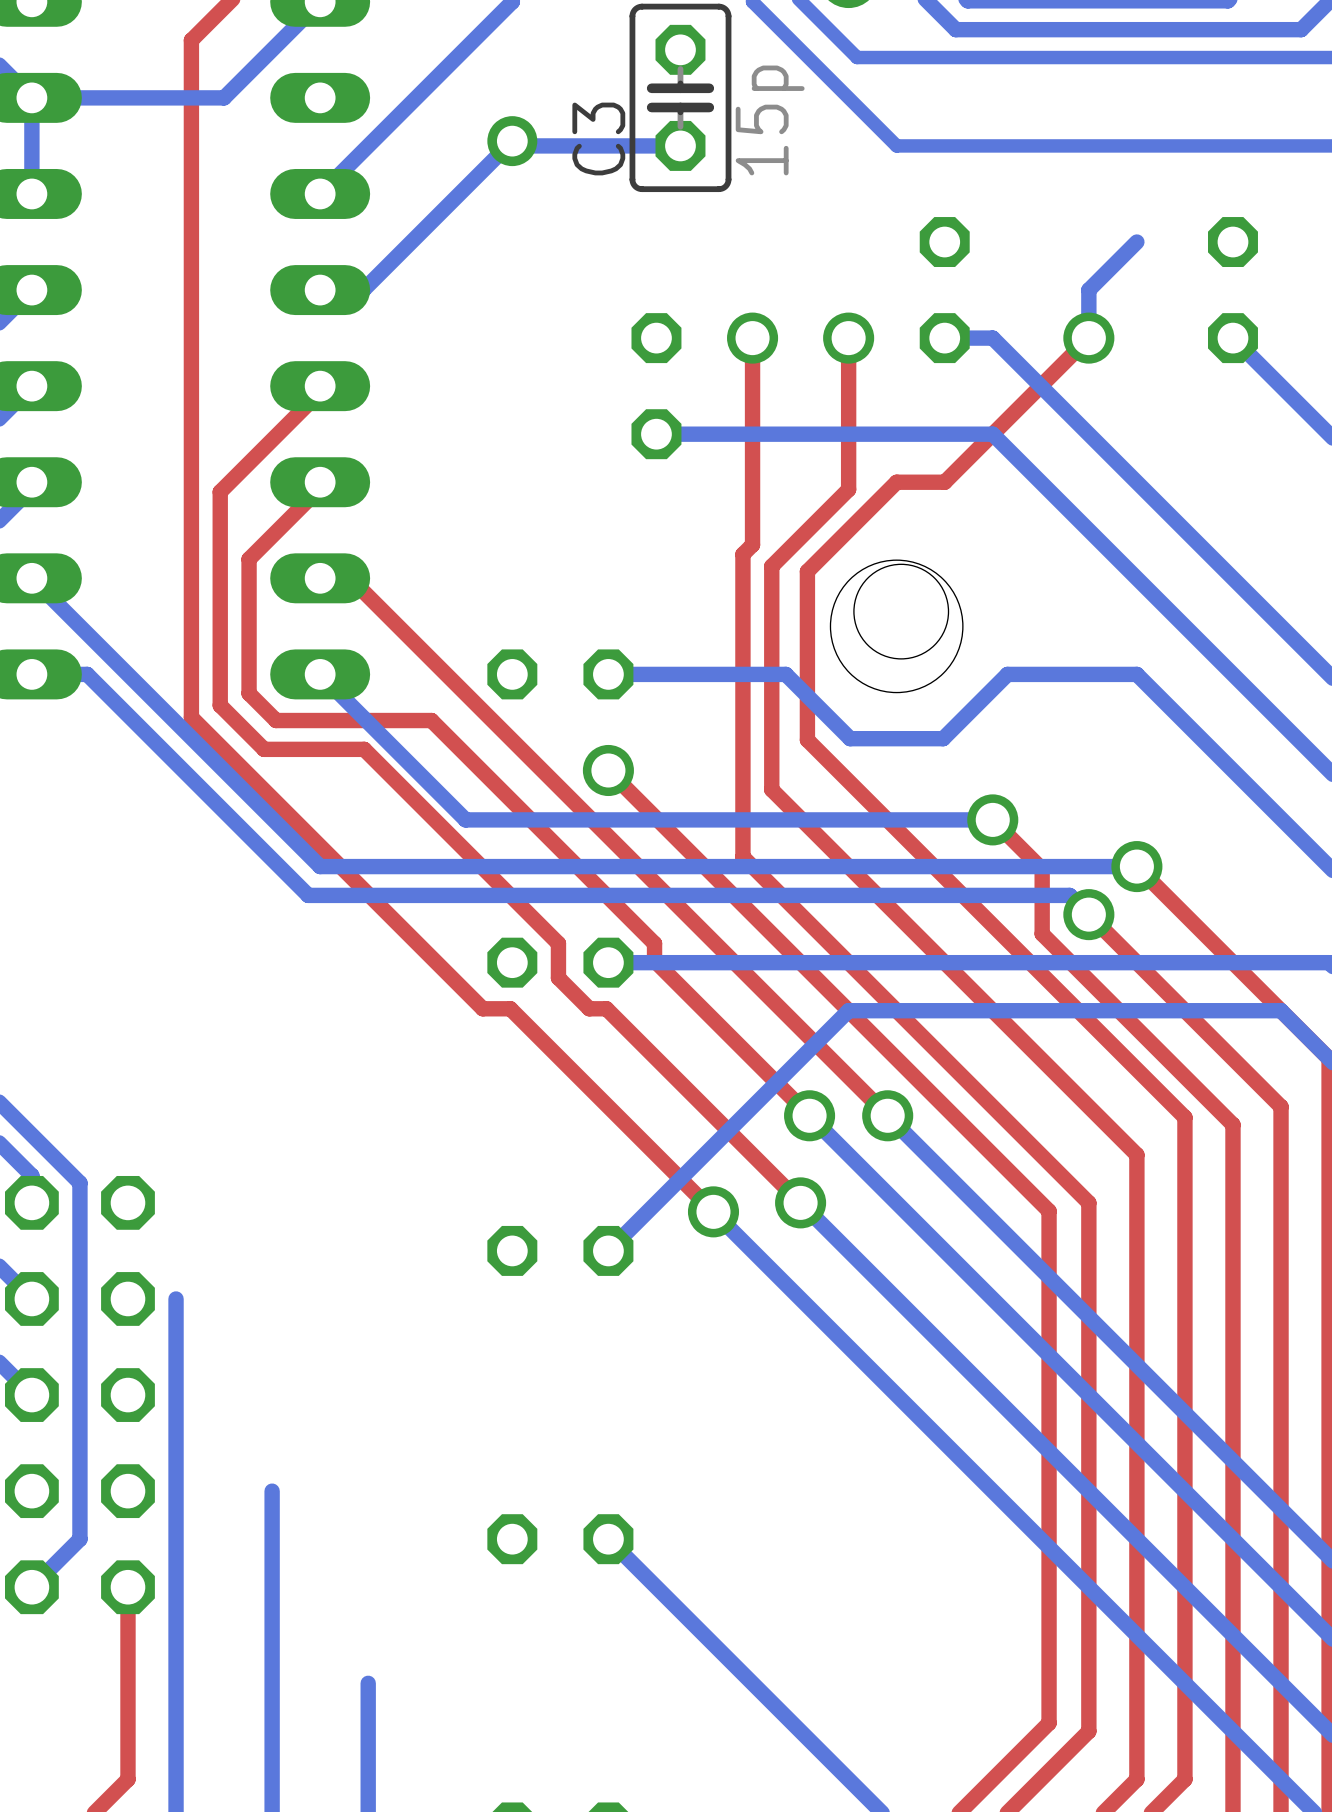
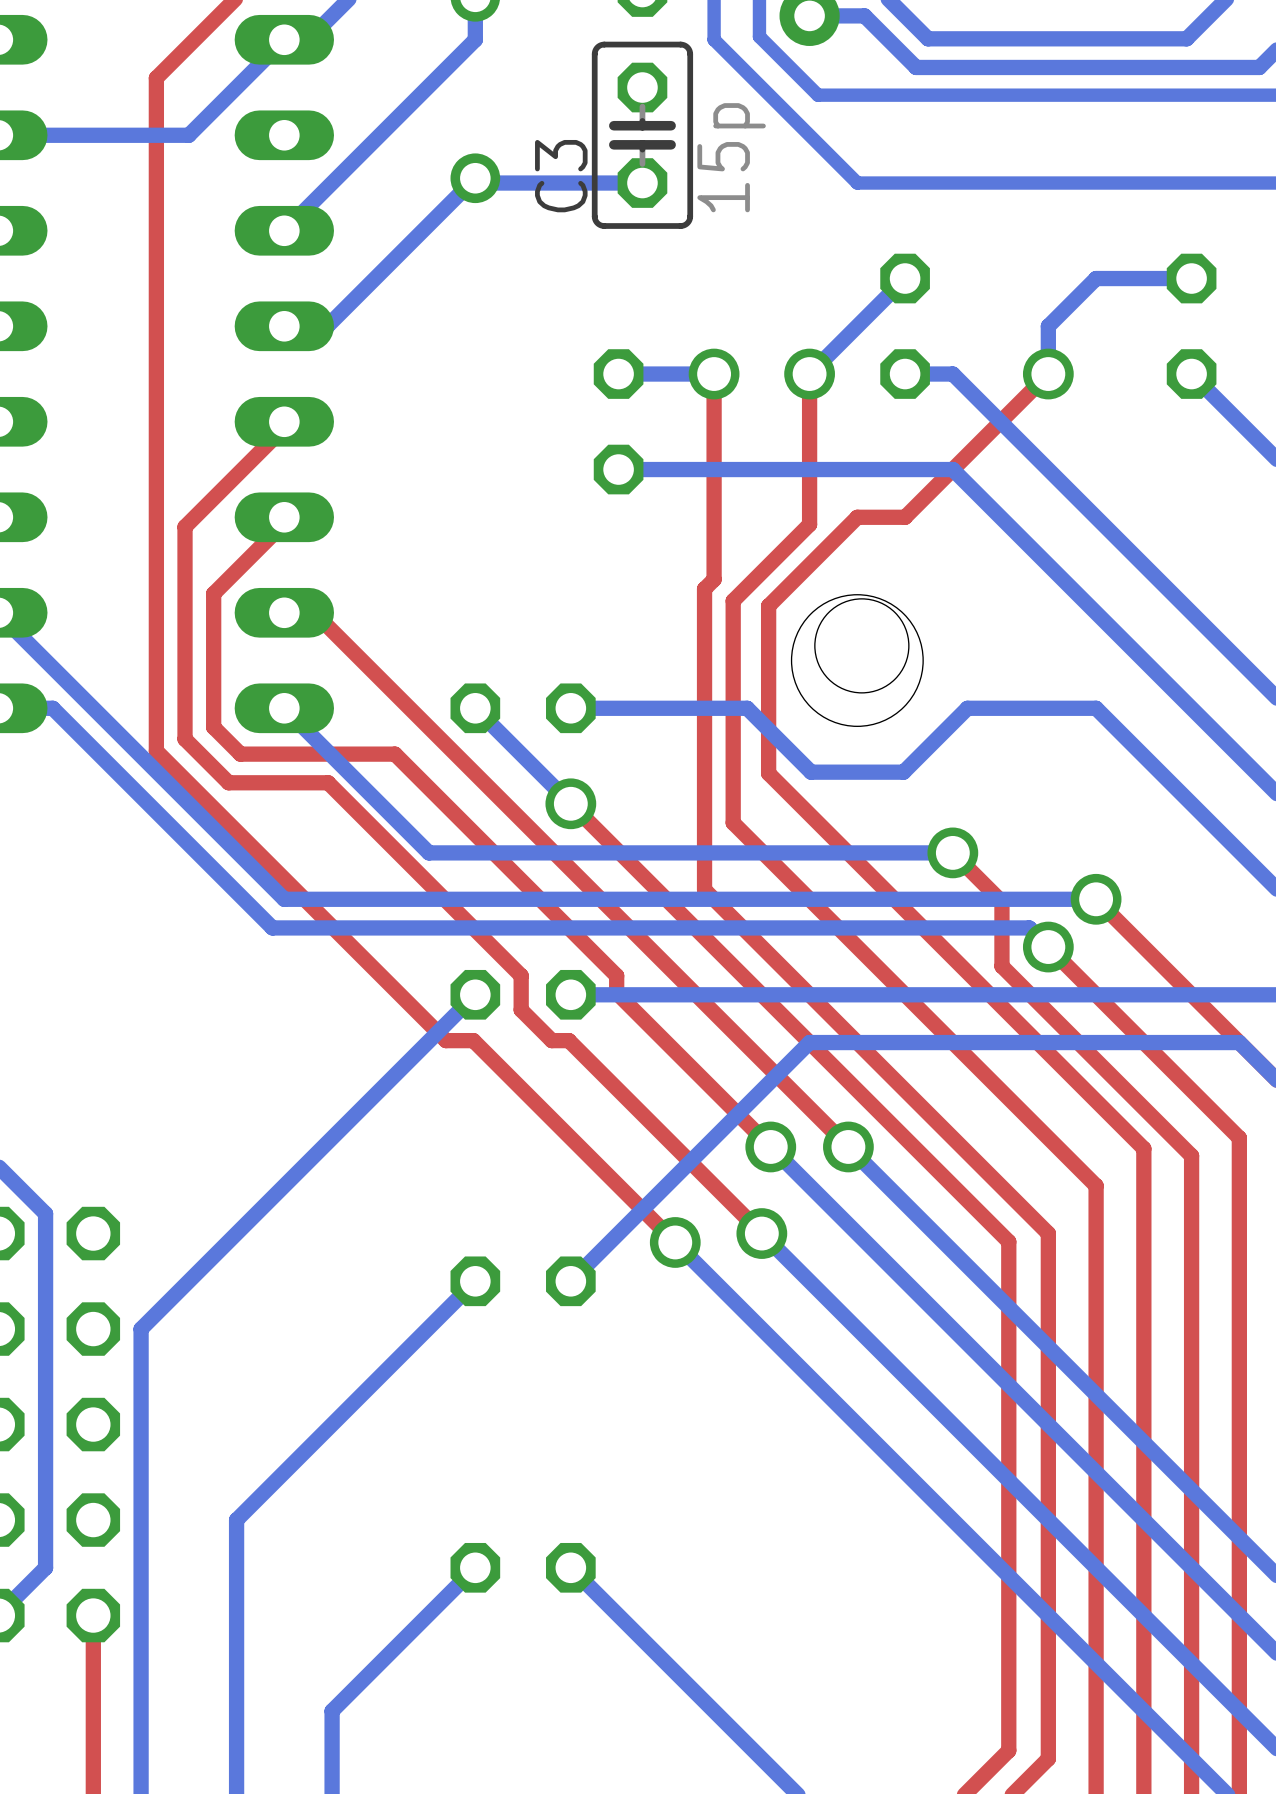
bottom track: none -> (905, 278) (809, 374)
bottom track: none -> (1191, 278) (1096, 278)
bottom track: none -> (714, 374) (618, 374)
bottom track: none -> (475, 708) (570, 803)
bottom track: none -> (475, 994) (141, 1329)
bottom track: none -> (475, 1281) (236, 1520)
bottom track: none -> (475, 1567) (332, 1711)

